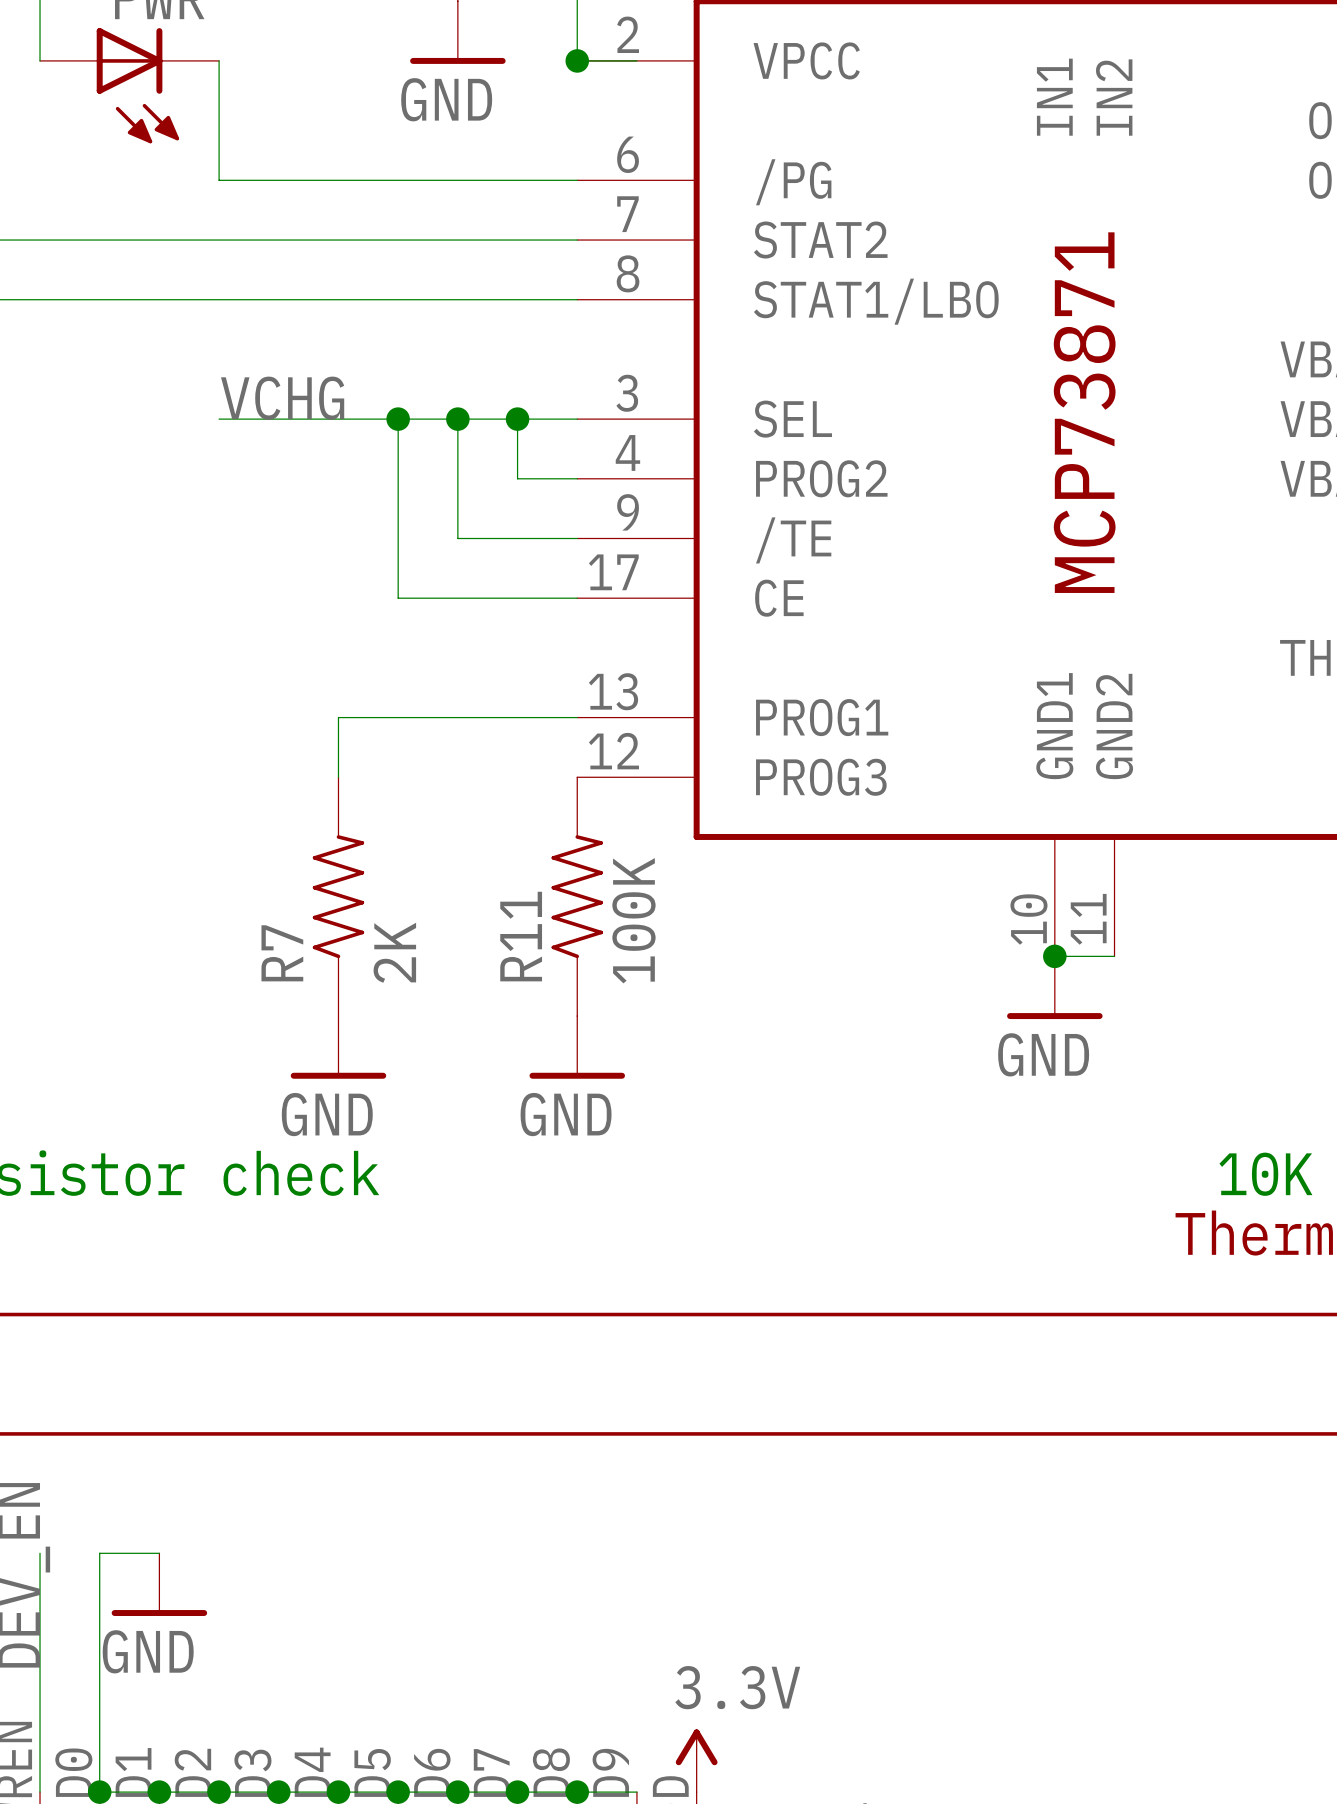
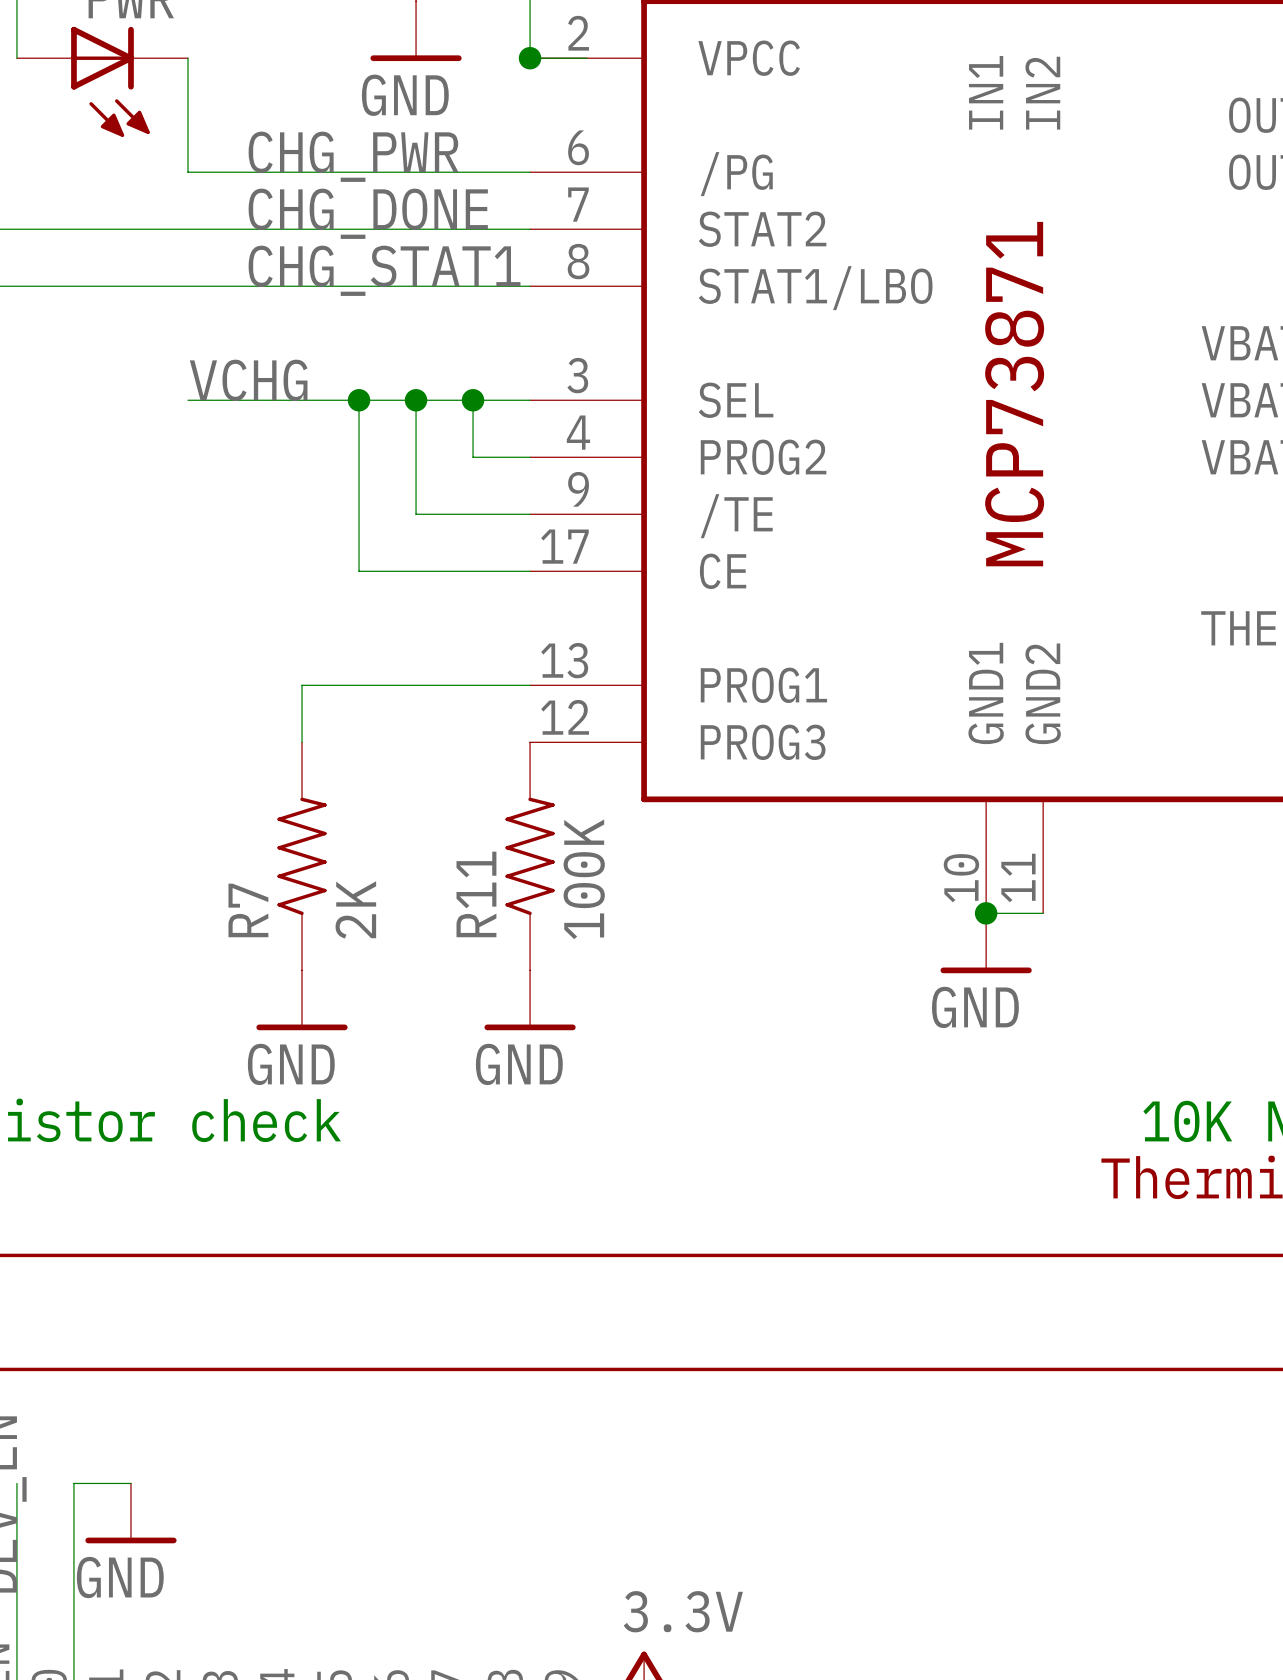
label: none -> CHG_PWR (353, 156)
label: none -> CHG_DONE (368, 213)
label: none -> CHG_STAT1 (384, 270)

